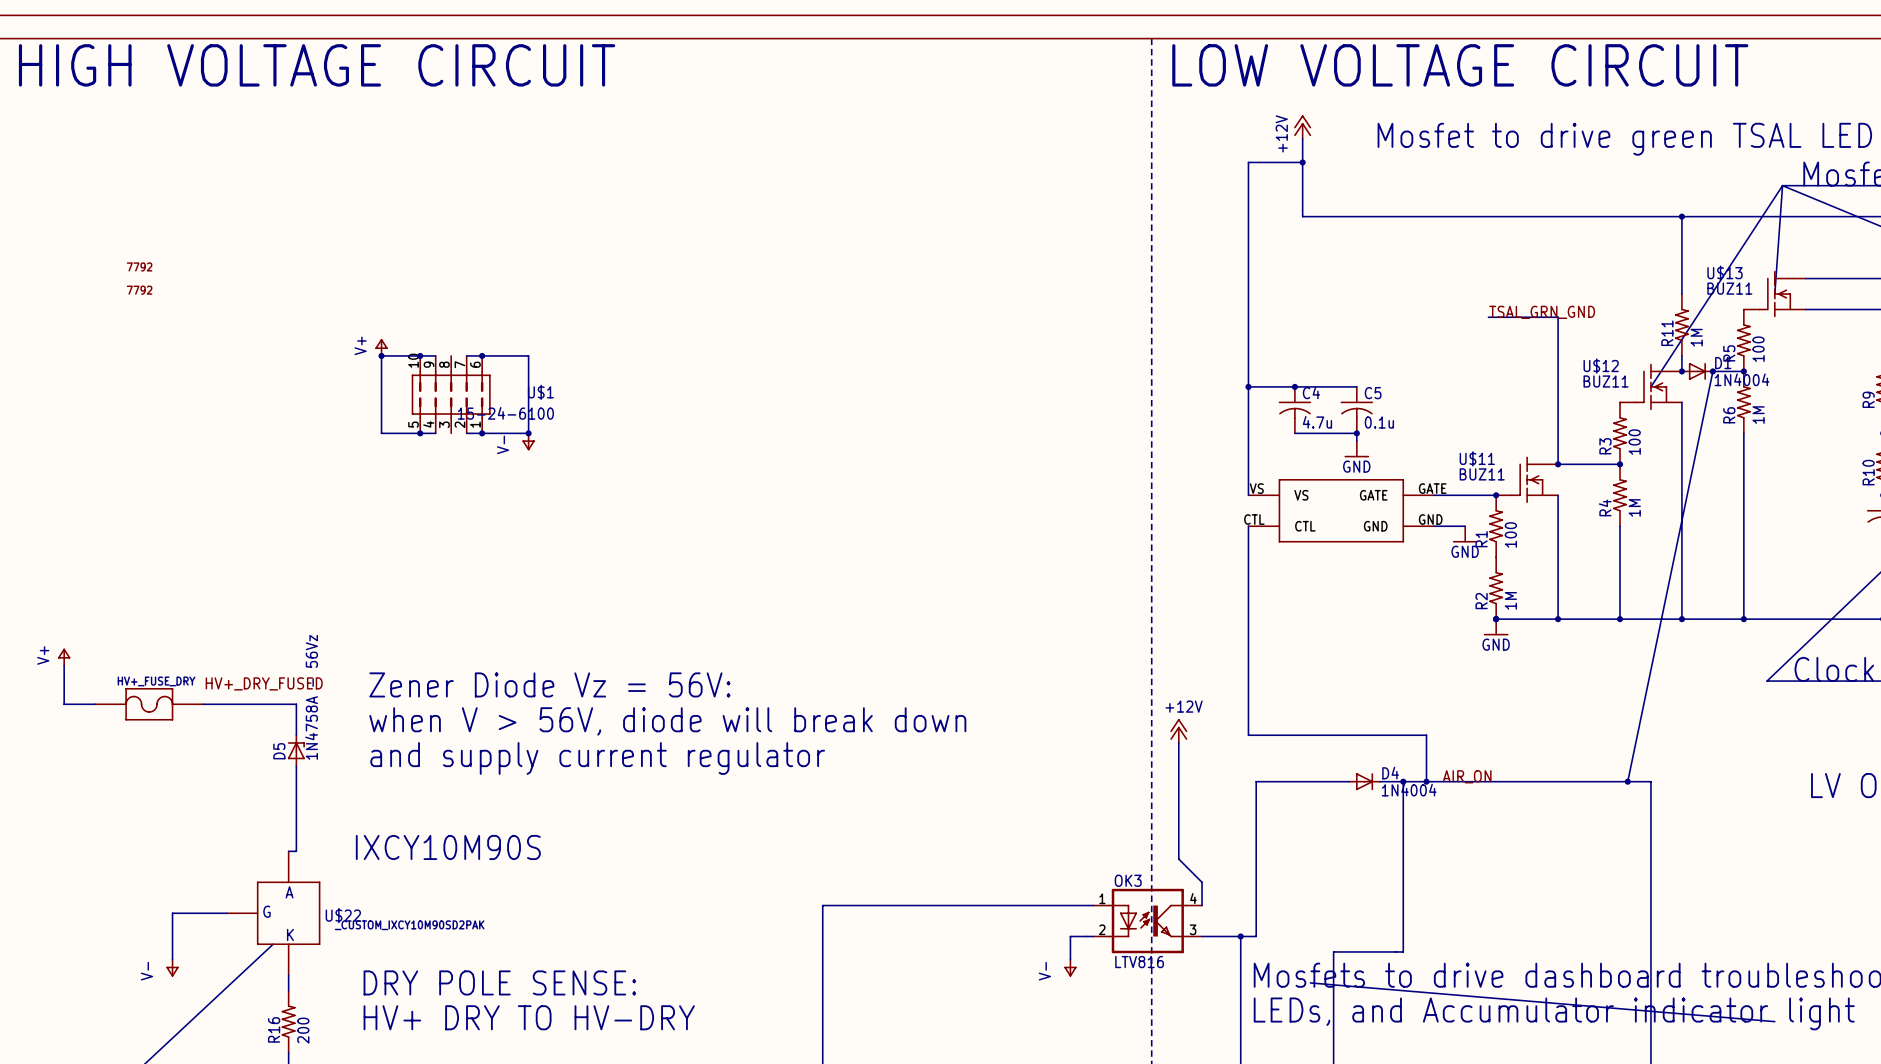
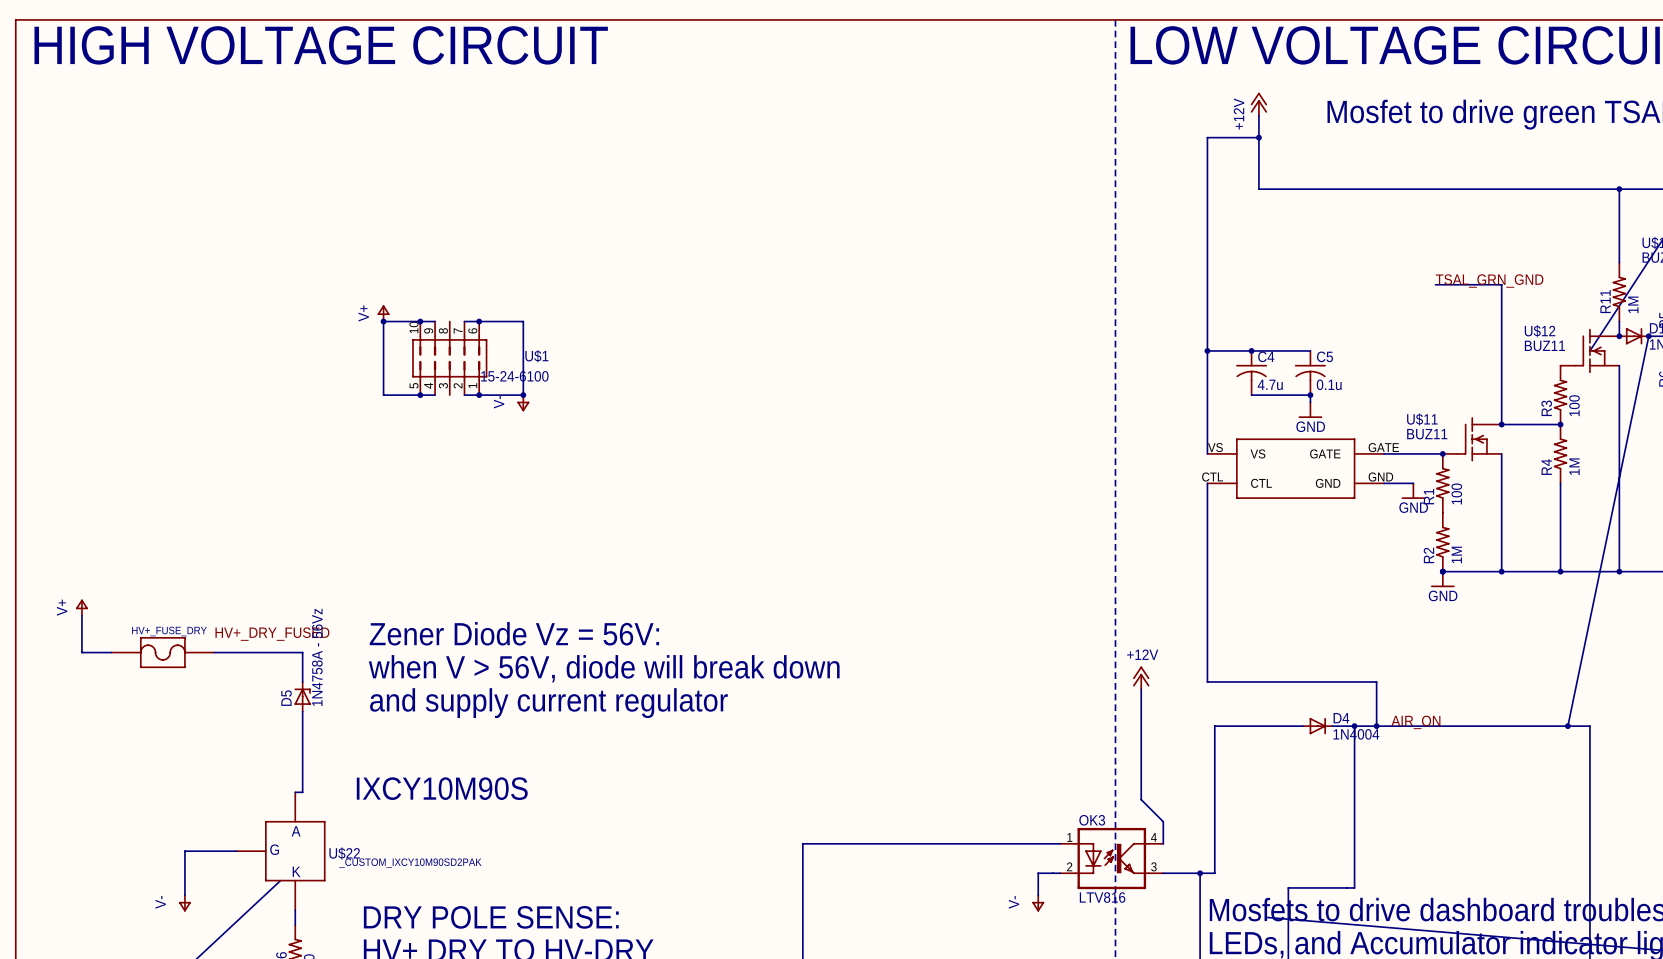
part: (139, 266) -> none
part: (139, 290) -> none

